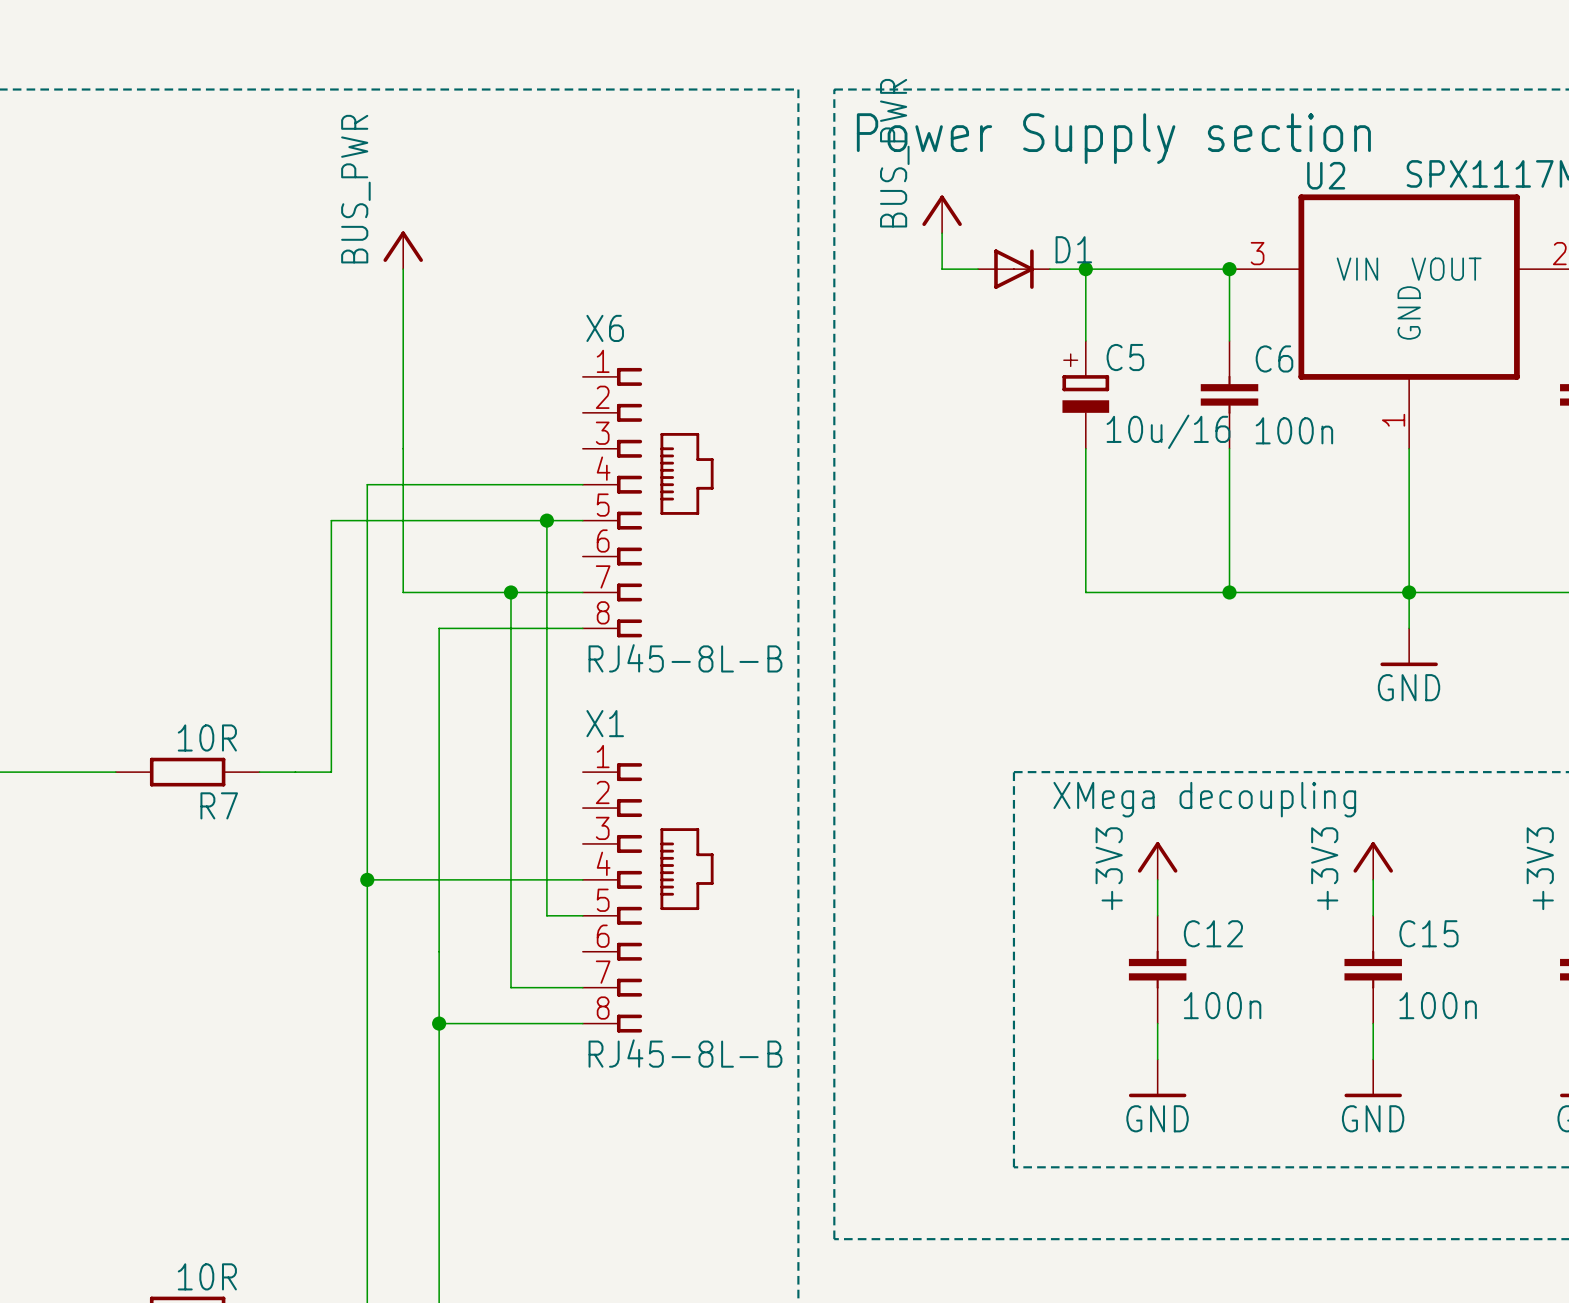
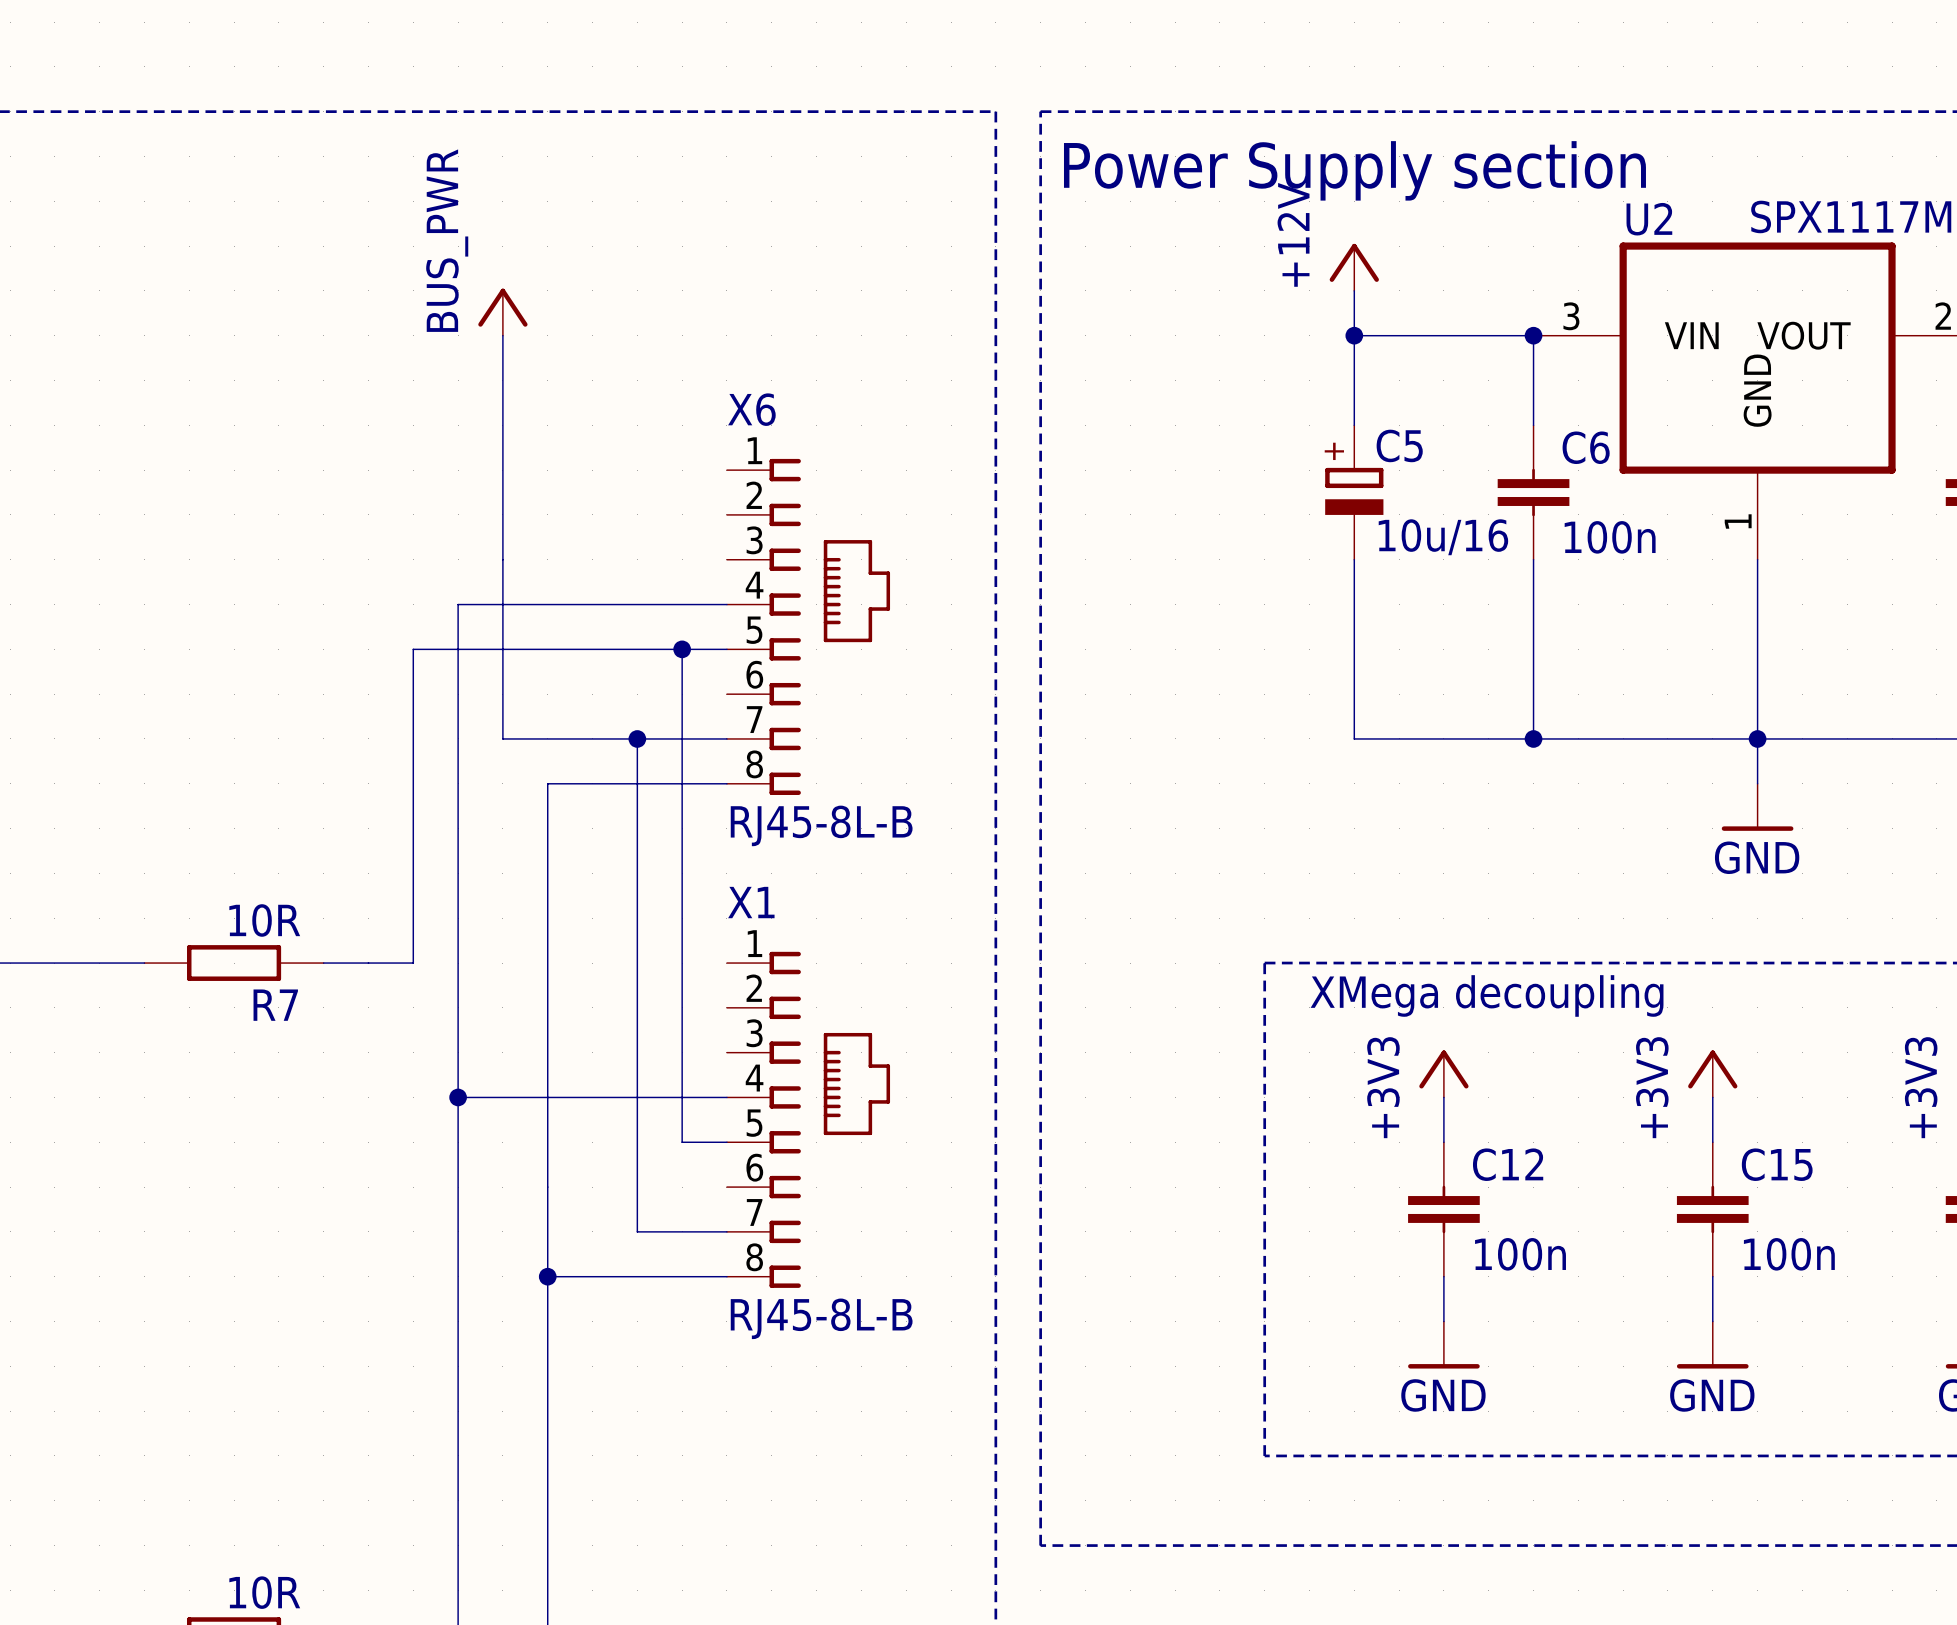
power symbol: BUS_PWR (942, 214) -> none
power symbol: none -> +12V (1354, 267)
wire: (942, 233) (942, 269) (978, 269) -> none
D1: (1013, 269) -> none
wire: (1049, 269) (1085, 269) -> (1354, 290) (1354, 335)

